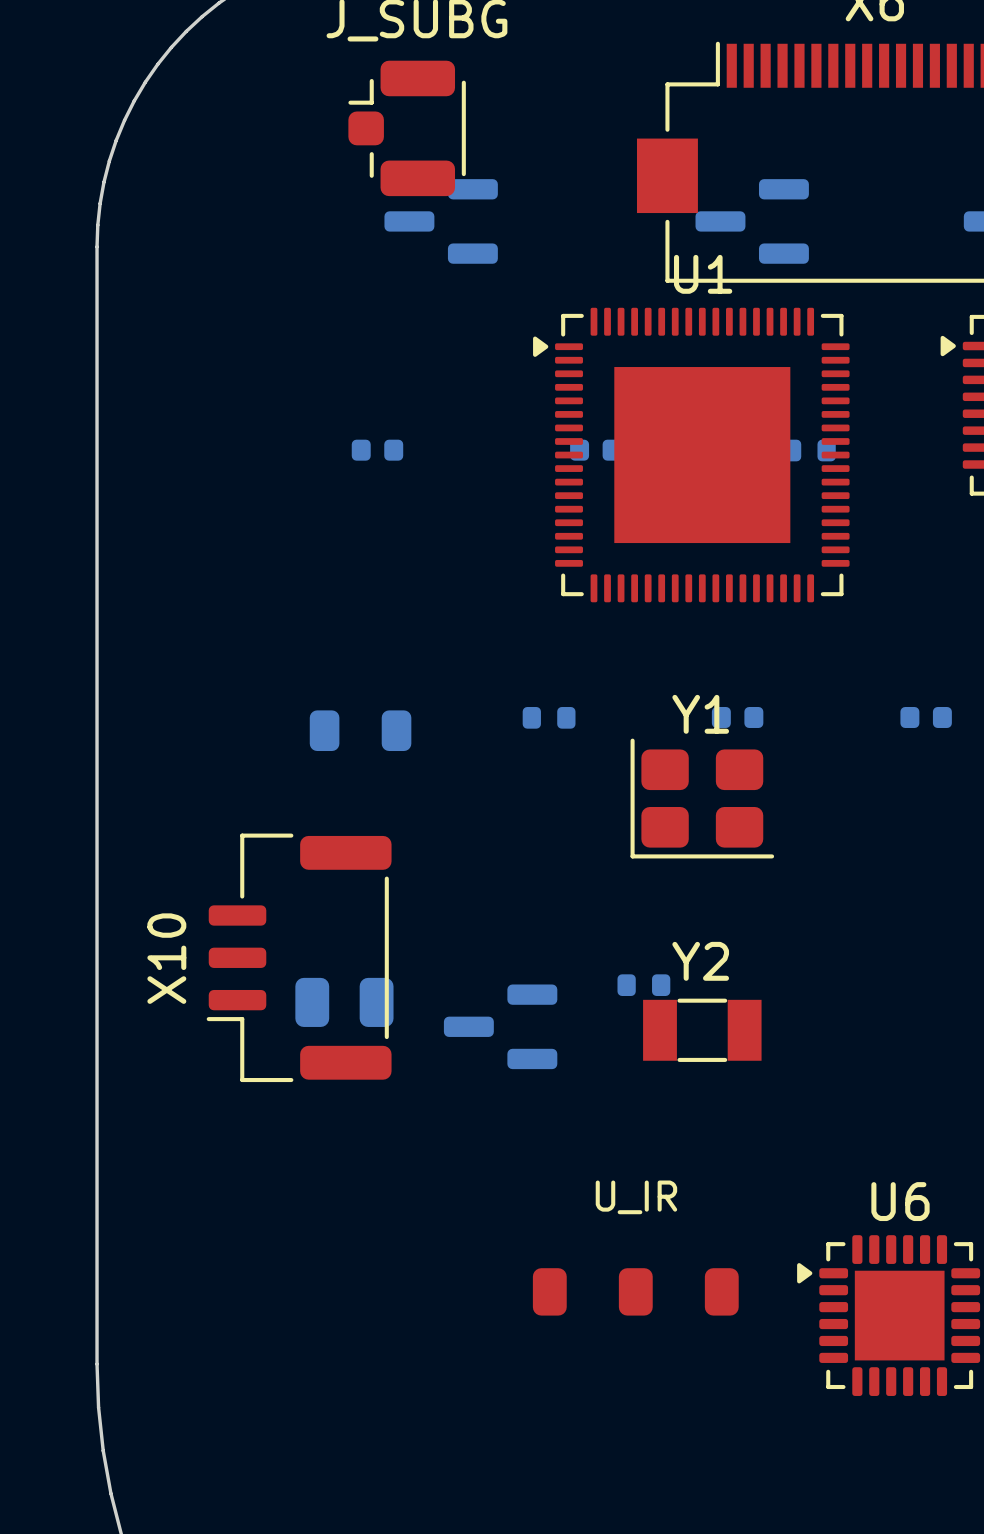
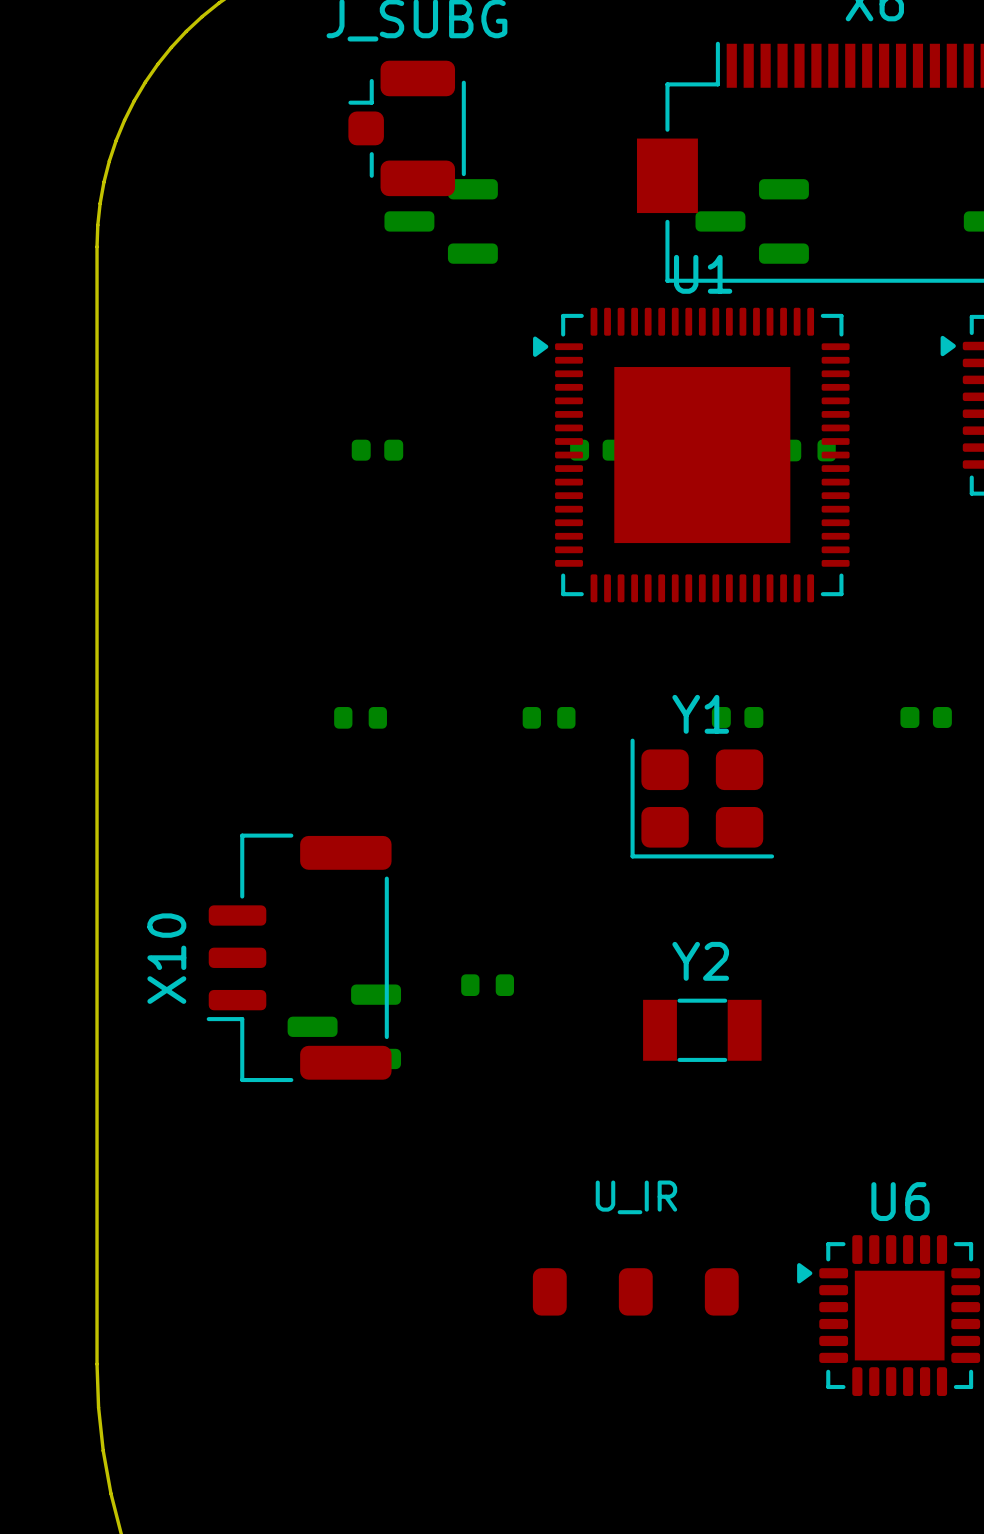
part footprint: [309, 710, 412, 752] -> [334, 707, 387, 729]
part footprint: [295, 977, 394, 1027] -> [287, 984, 402, 1070]
part position: (643, 985) -> (487, 985)
part: (500, 1026) -> none

